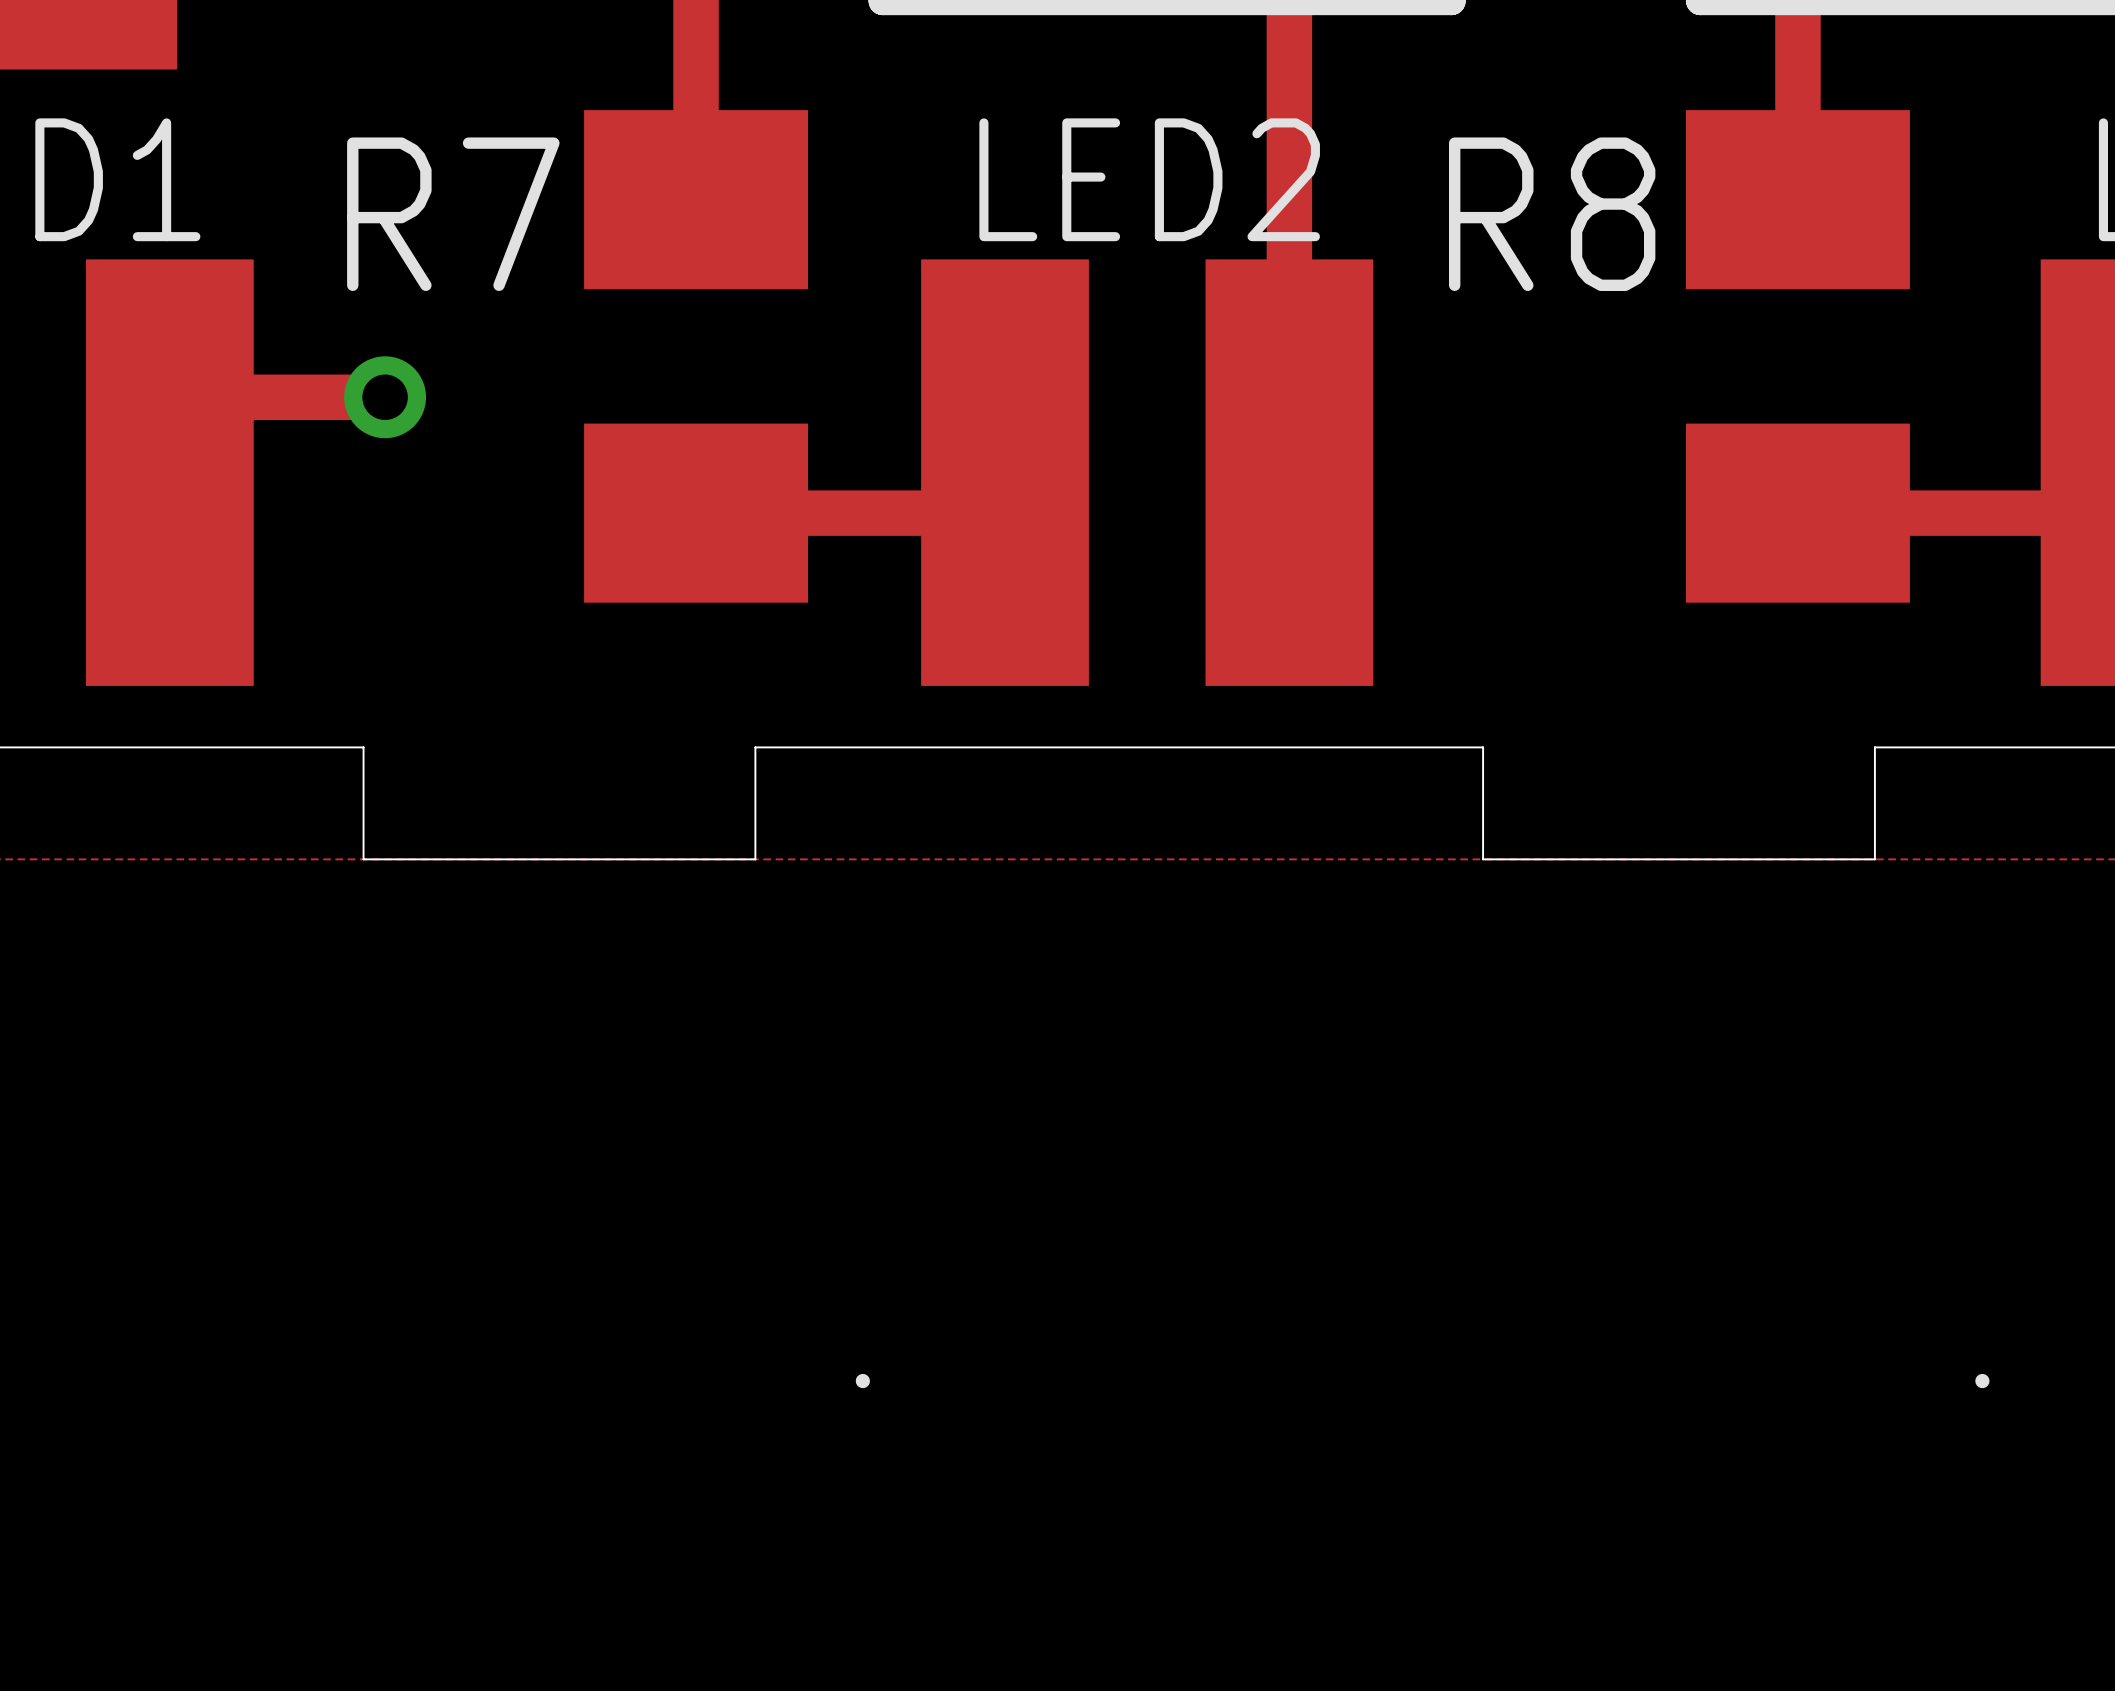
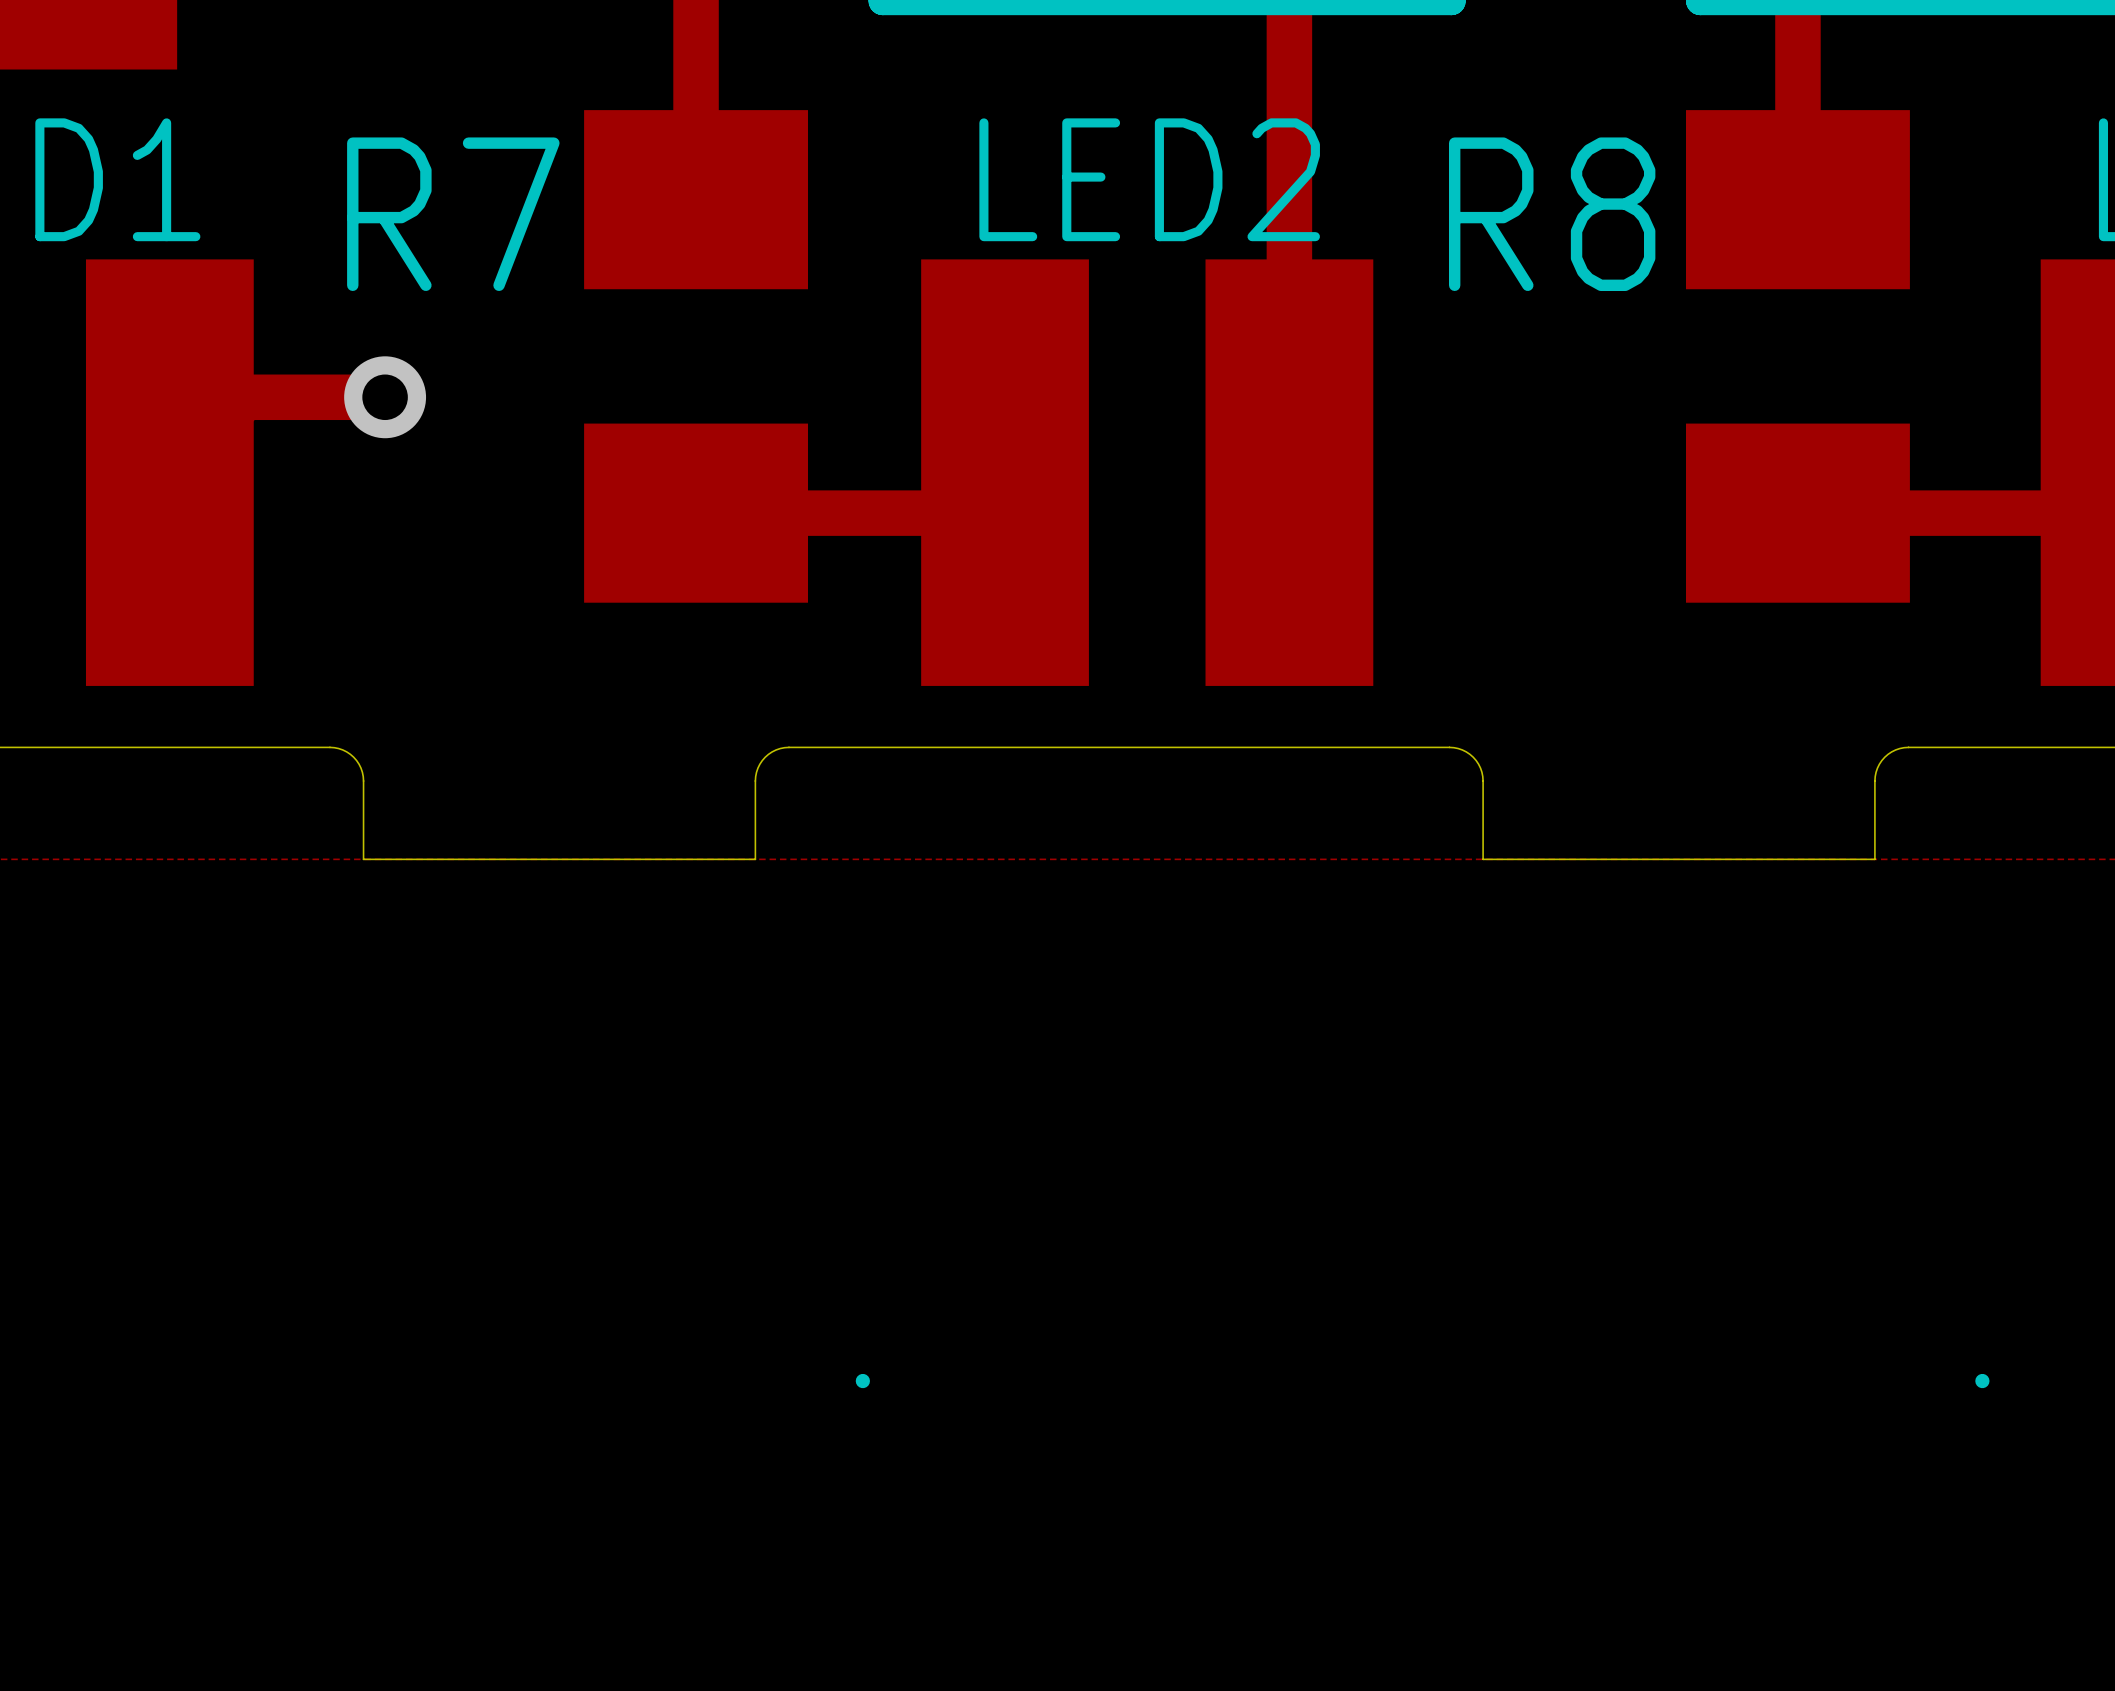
board edge: (329, 747) (363, 747) (363, 780) -> (329, 747) (342, 749) (353, 757) (360, 768) (363, 780)
board edge: (788, 747) (755, 747) (755, 780) -> (788, 747) (776, 749) (765, 757) (757, 768) (755, 780)
board edge: (1449, 747) (1483, 747) (1483, 780) -> (1449, 747) (1462, 749) (1473, 757) (1480, 768) (1483, 780)
board edge: (1908, 747) (1874, 747) (1874, 780) -> (1908, 747) (1895, 749) (1884, 757) (1877, 768) (1874, 780)

